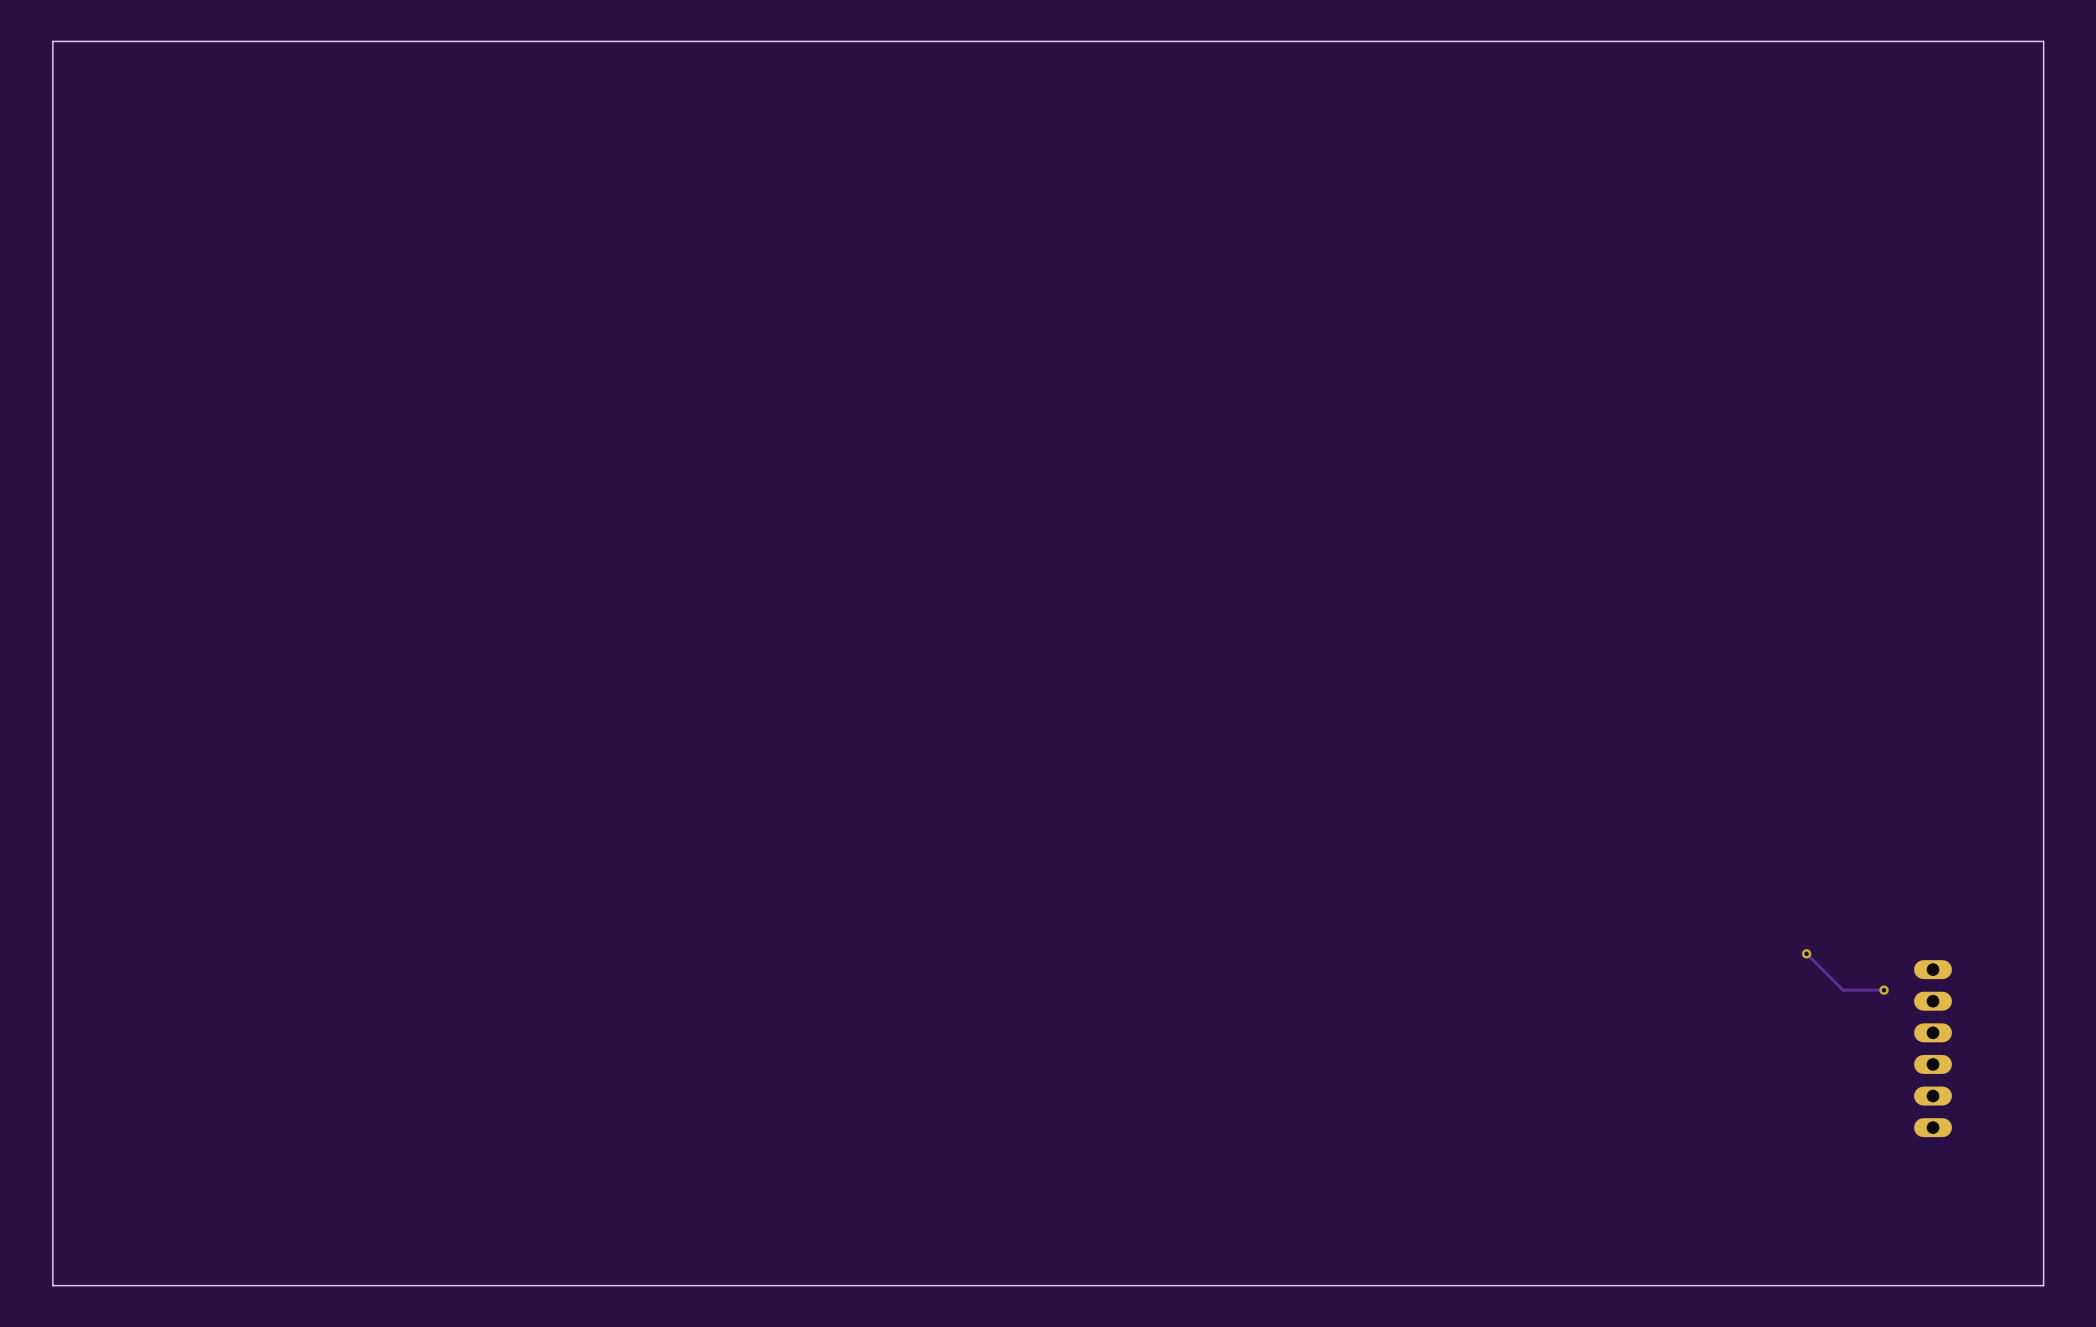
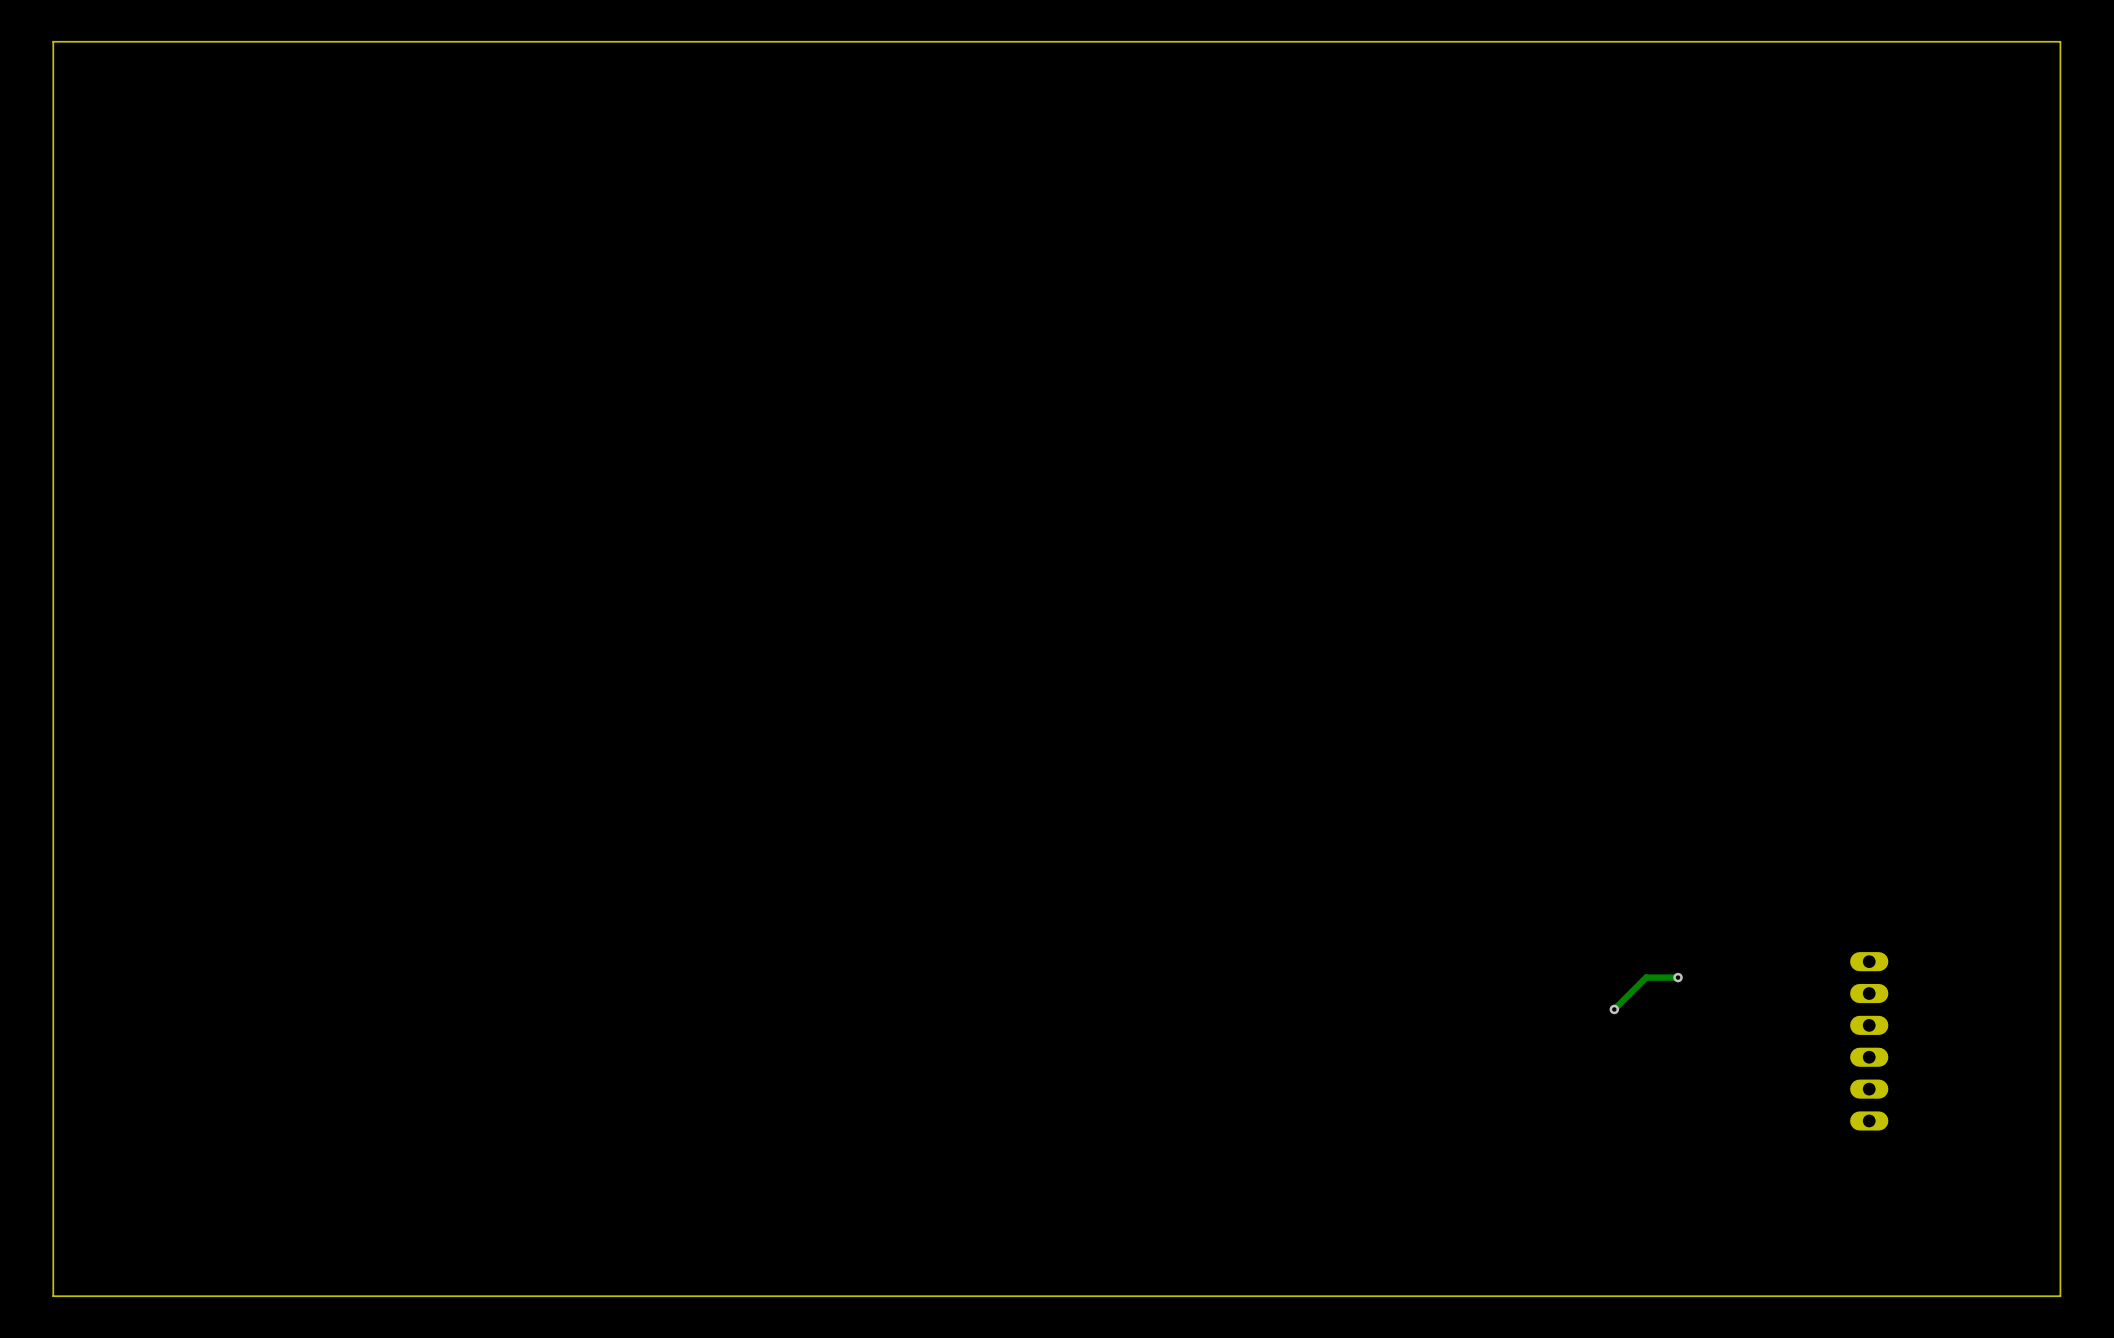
track: (1806, 953) (1842, 990) (1884, 990) -> none
via: (1806, 953) -> none
track: none -> (1678, 977) (1646, 977) (1614, 1009)
via: none -> (1678, 977)
via: (1884, 990) -> none
via: none -> (1614, 1009)
part position: (1933, 1048) -> (1869, 1041)

